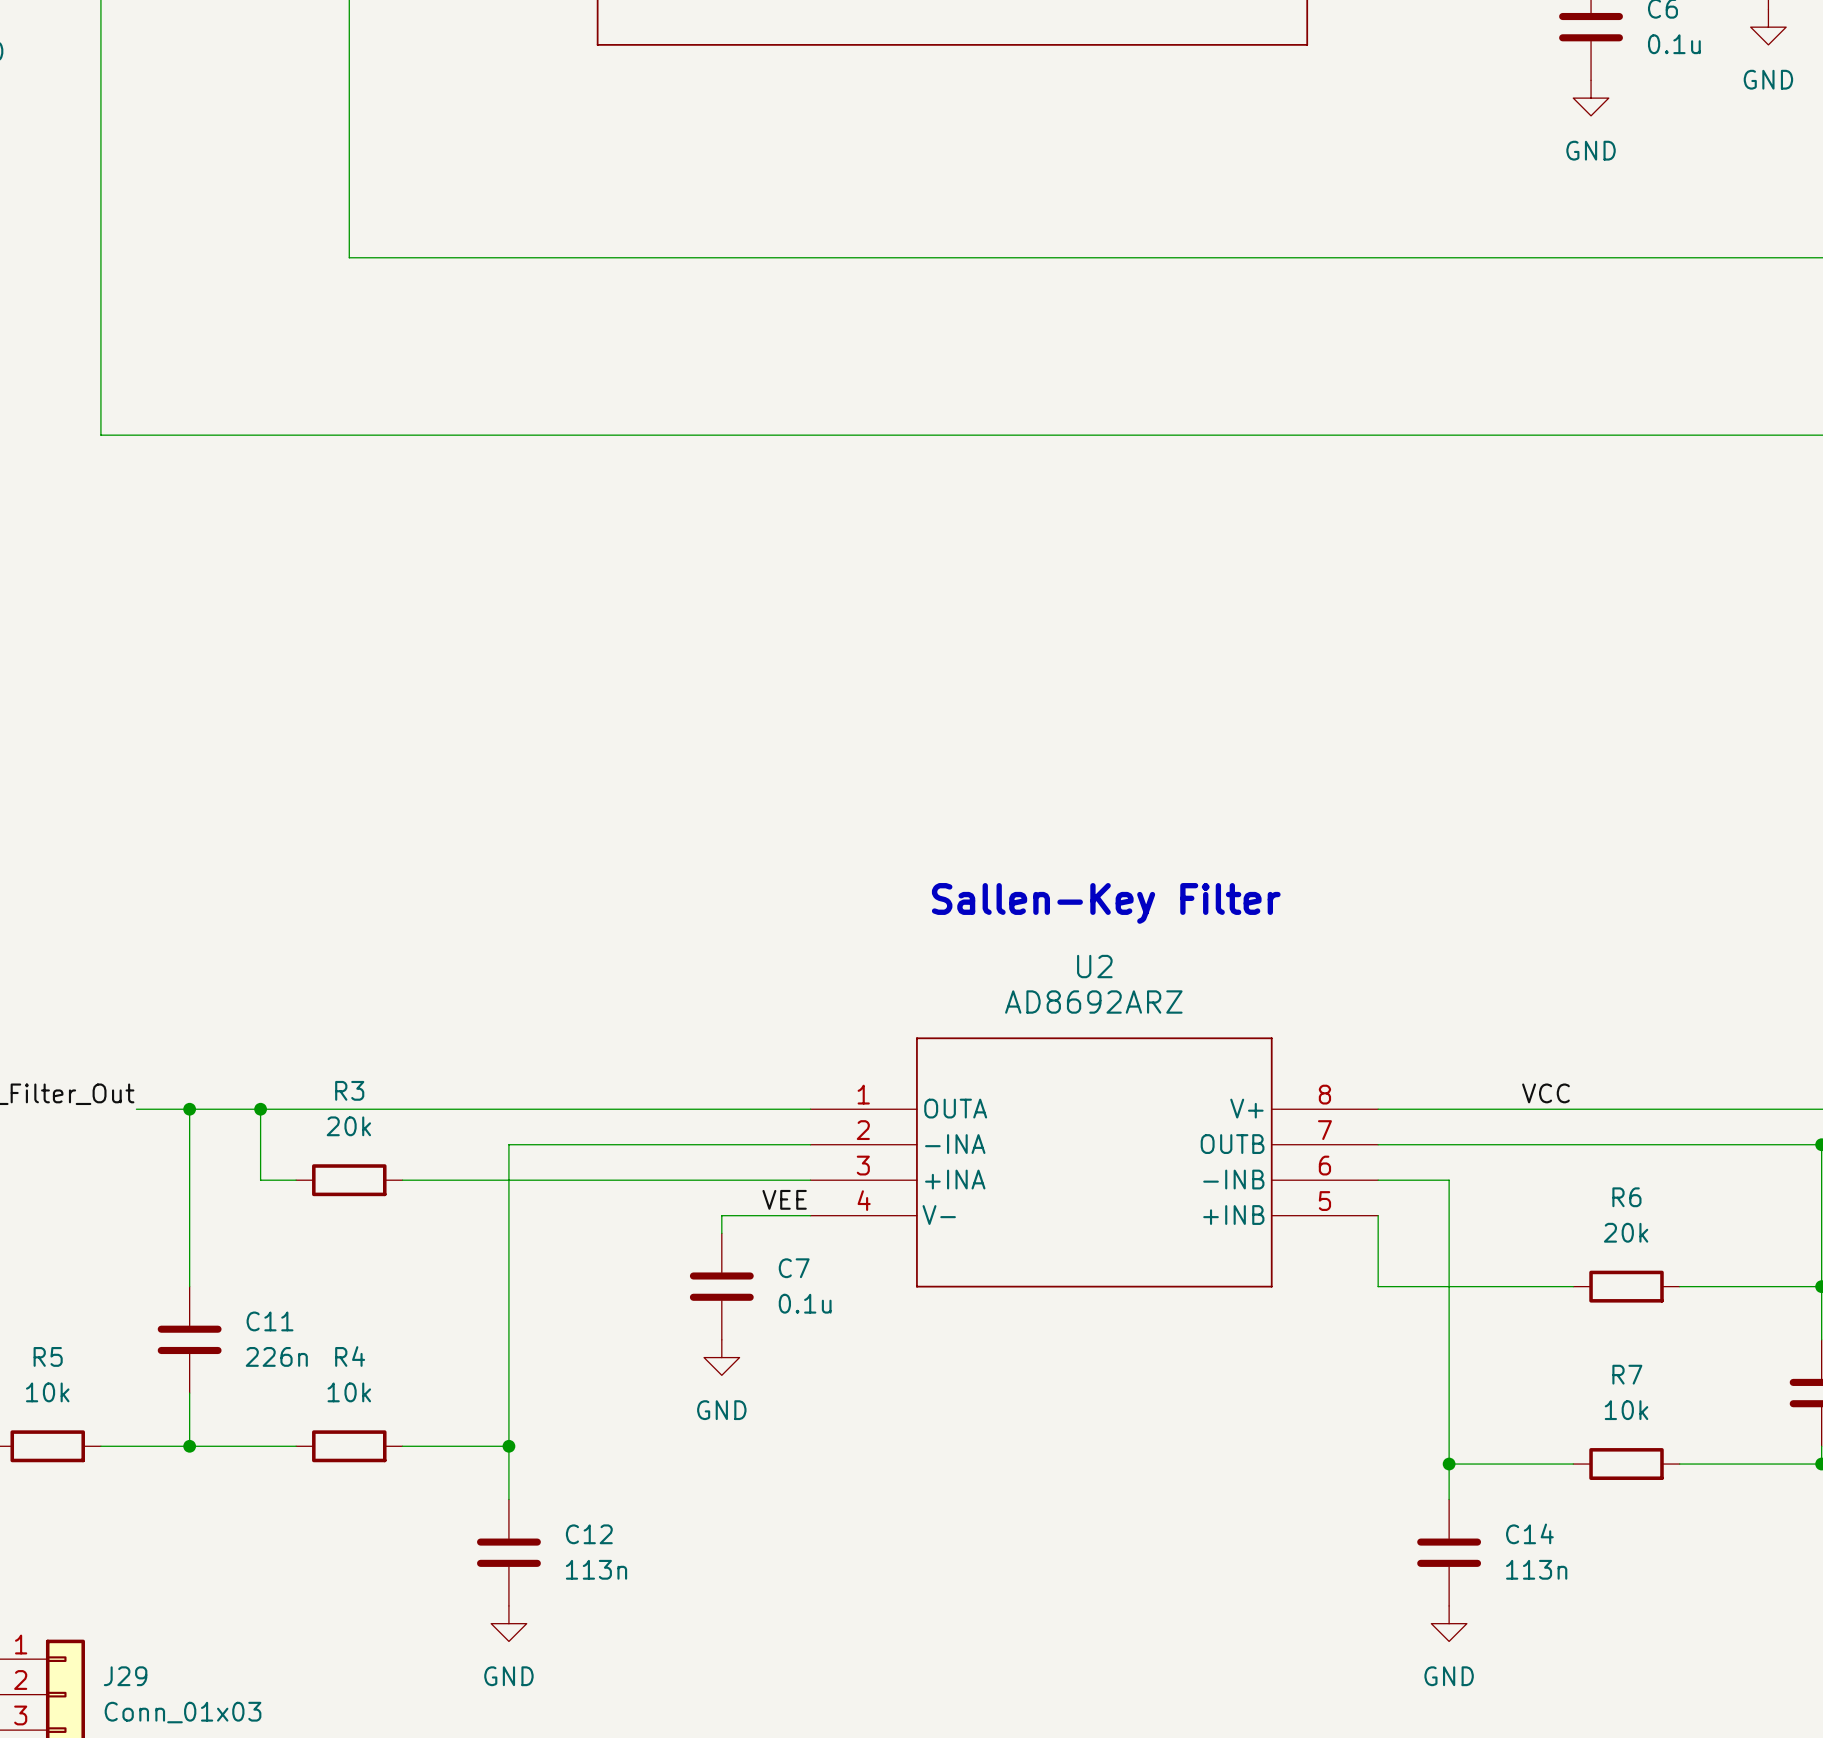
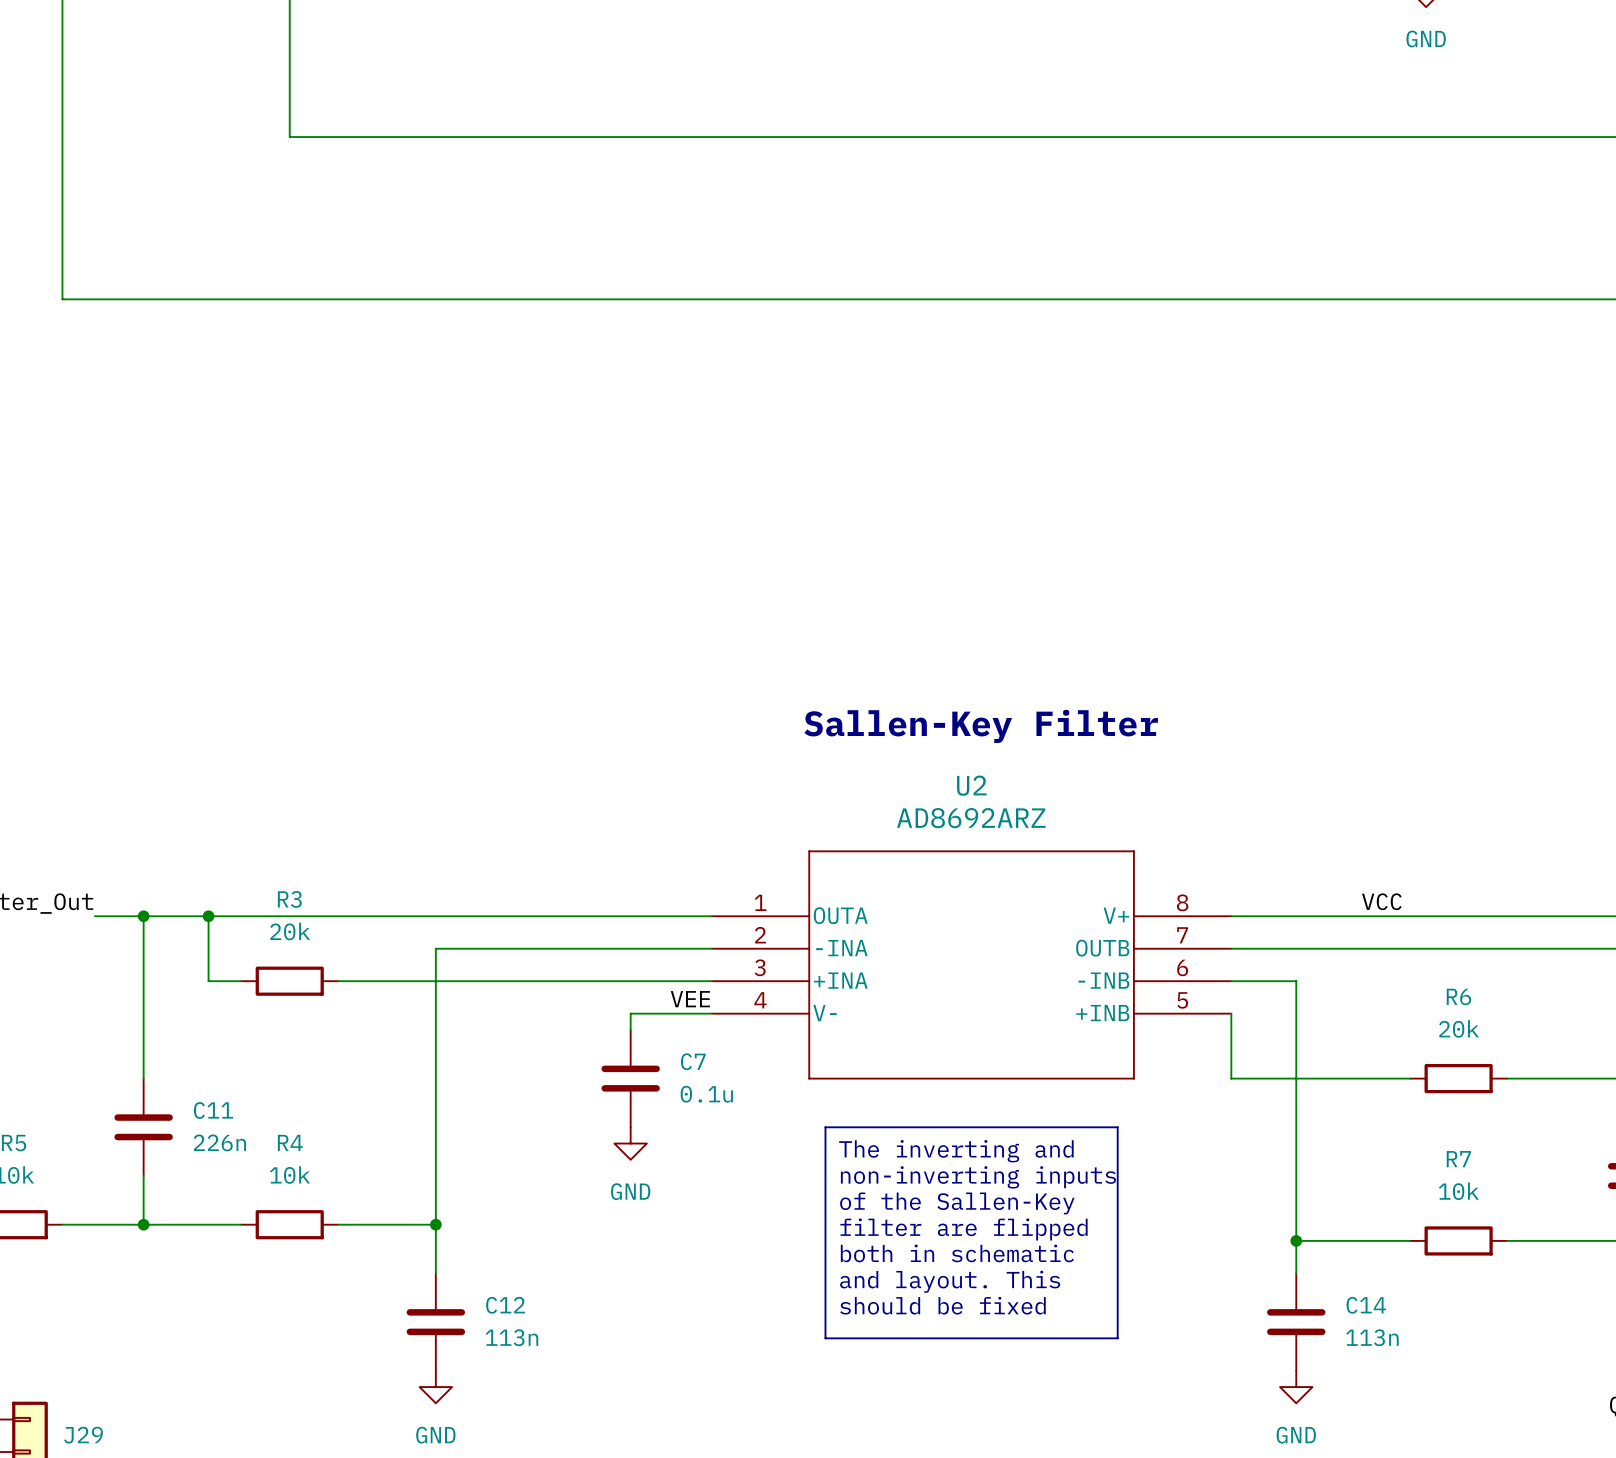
line: none -> (825, 1127) (1117, 1127) (1117, 1338) (825, 1338) (825, 1127)
text: none -> The inverting and (956, 1151)
text: none -> non-inverting inputs (978, 1177)
text: none -> of the Sallen-Key (957, 1203)
text: none -> filter are flipped (963, 1229)
text: none -> both in schematic (957, 1253)
text: none -> and layout. This (950, 1281)
text: none -> should be fixed (942, 1305)

